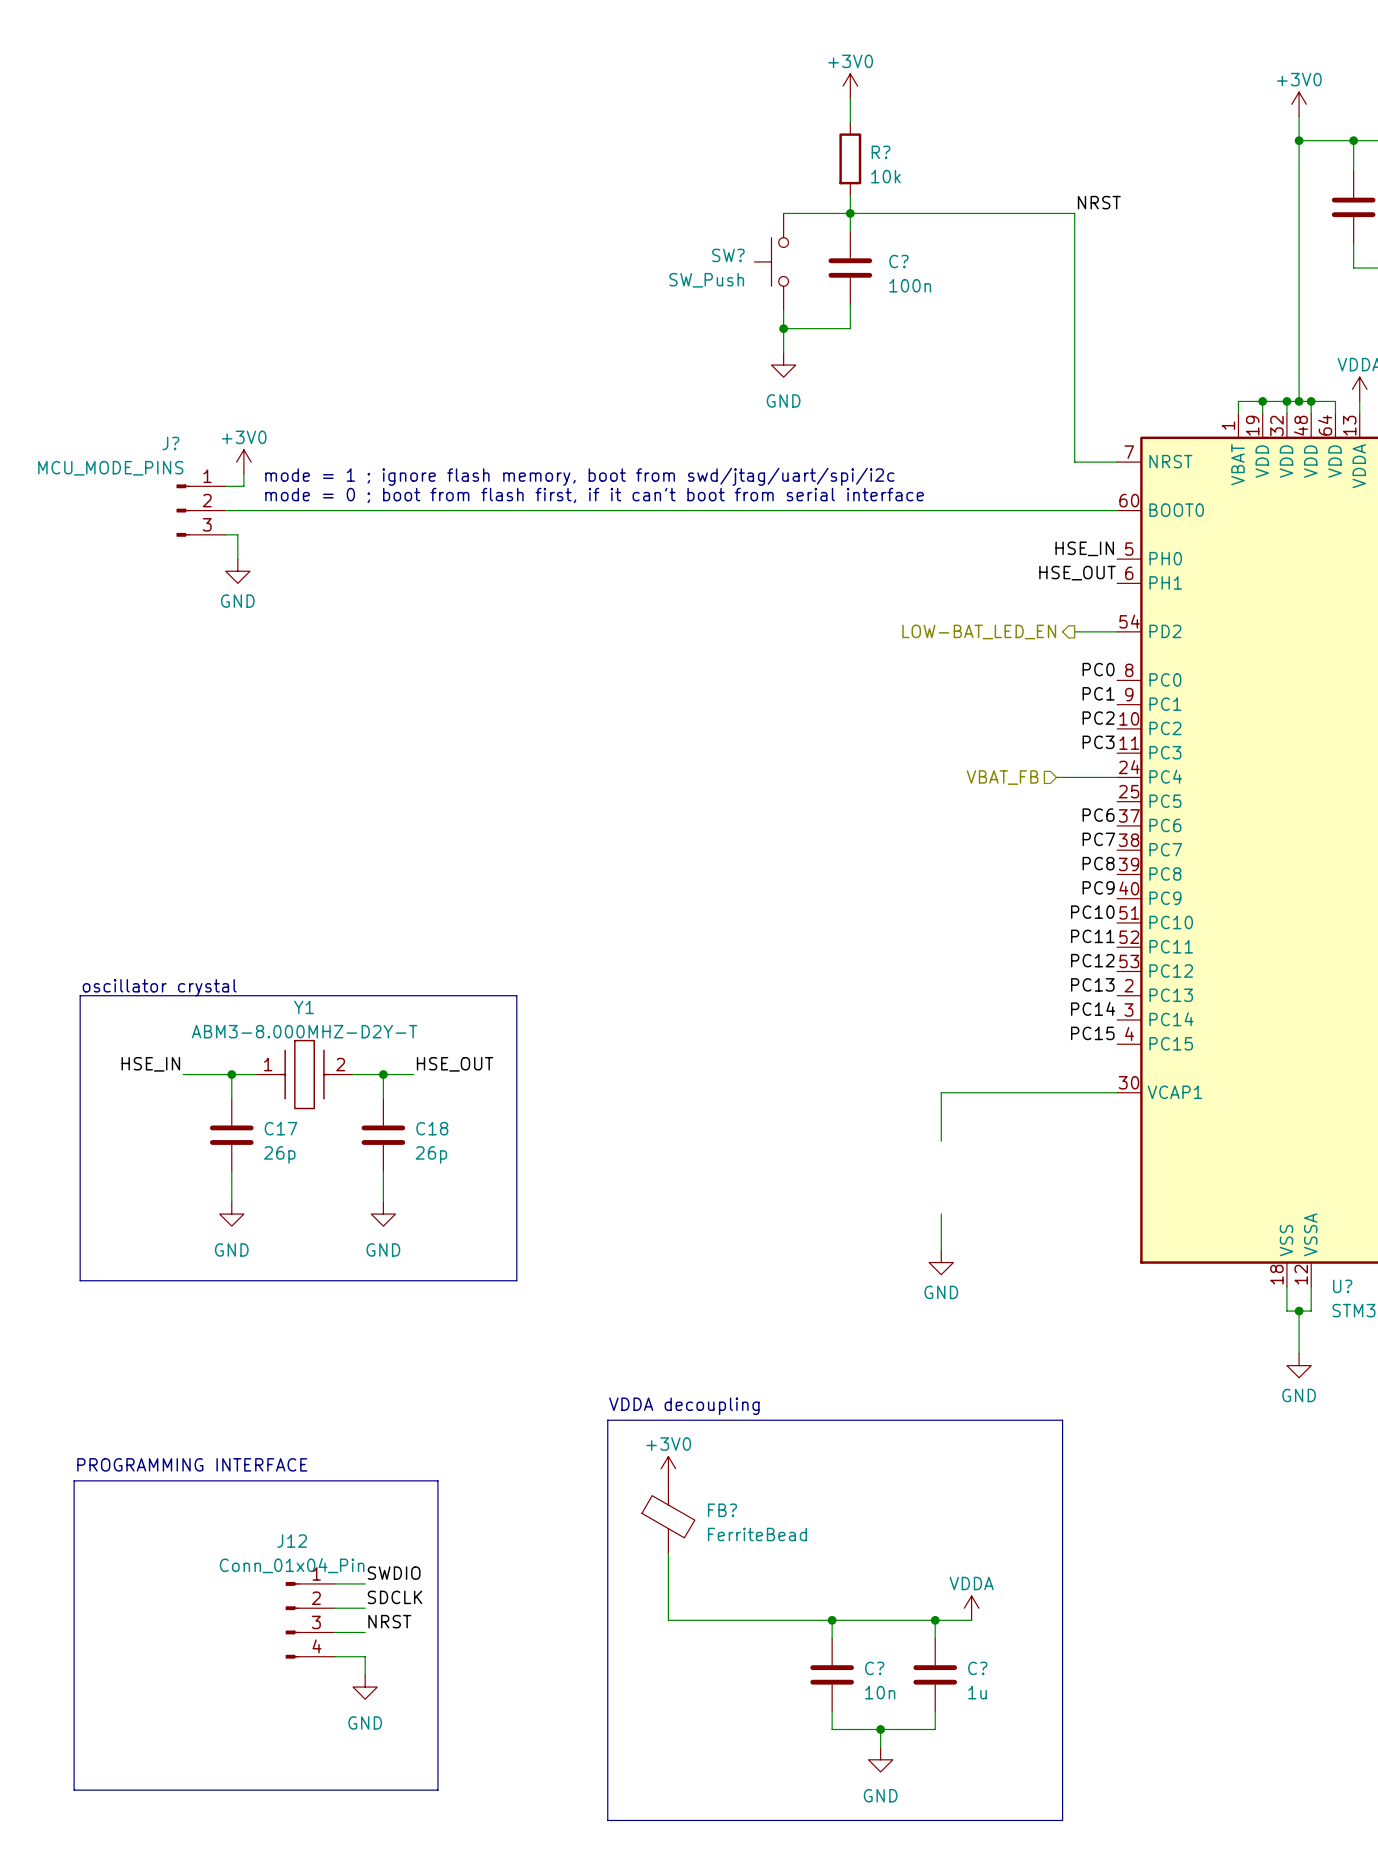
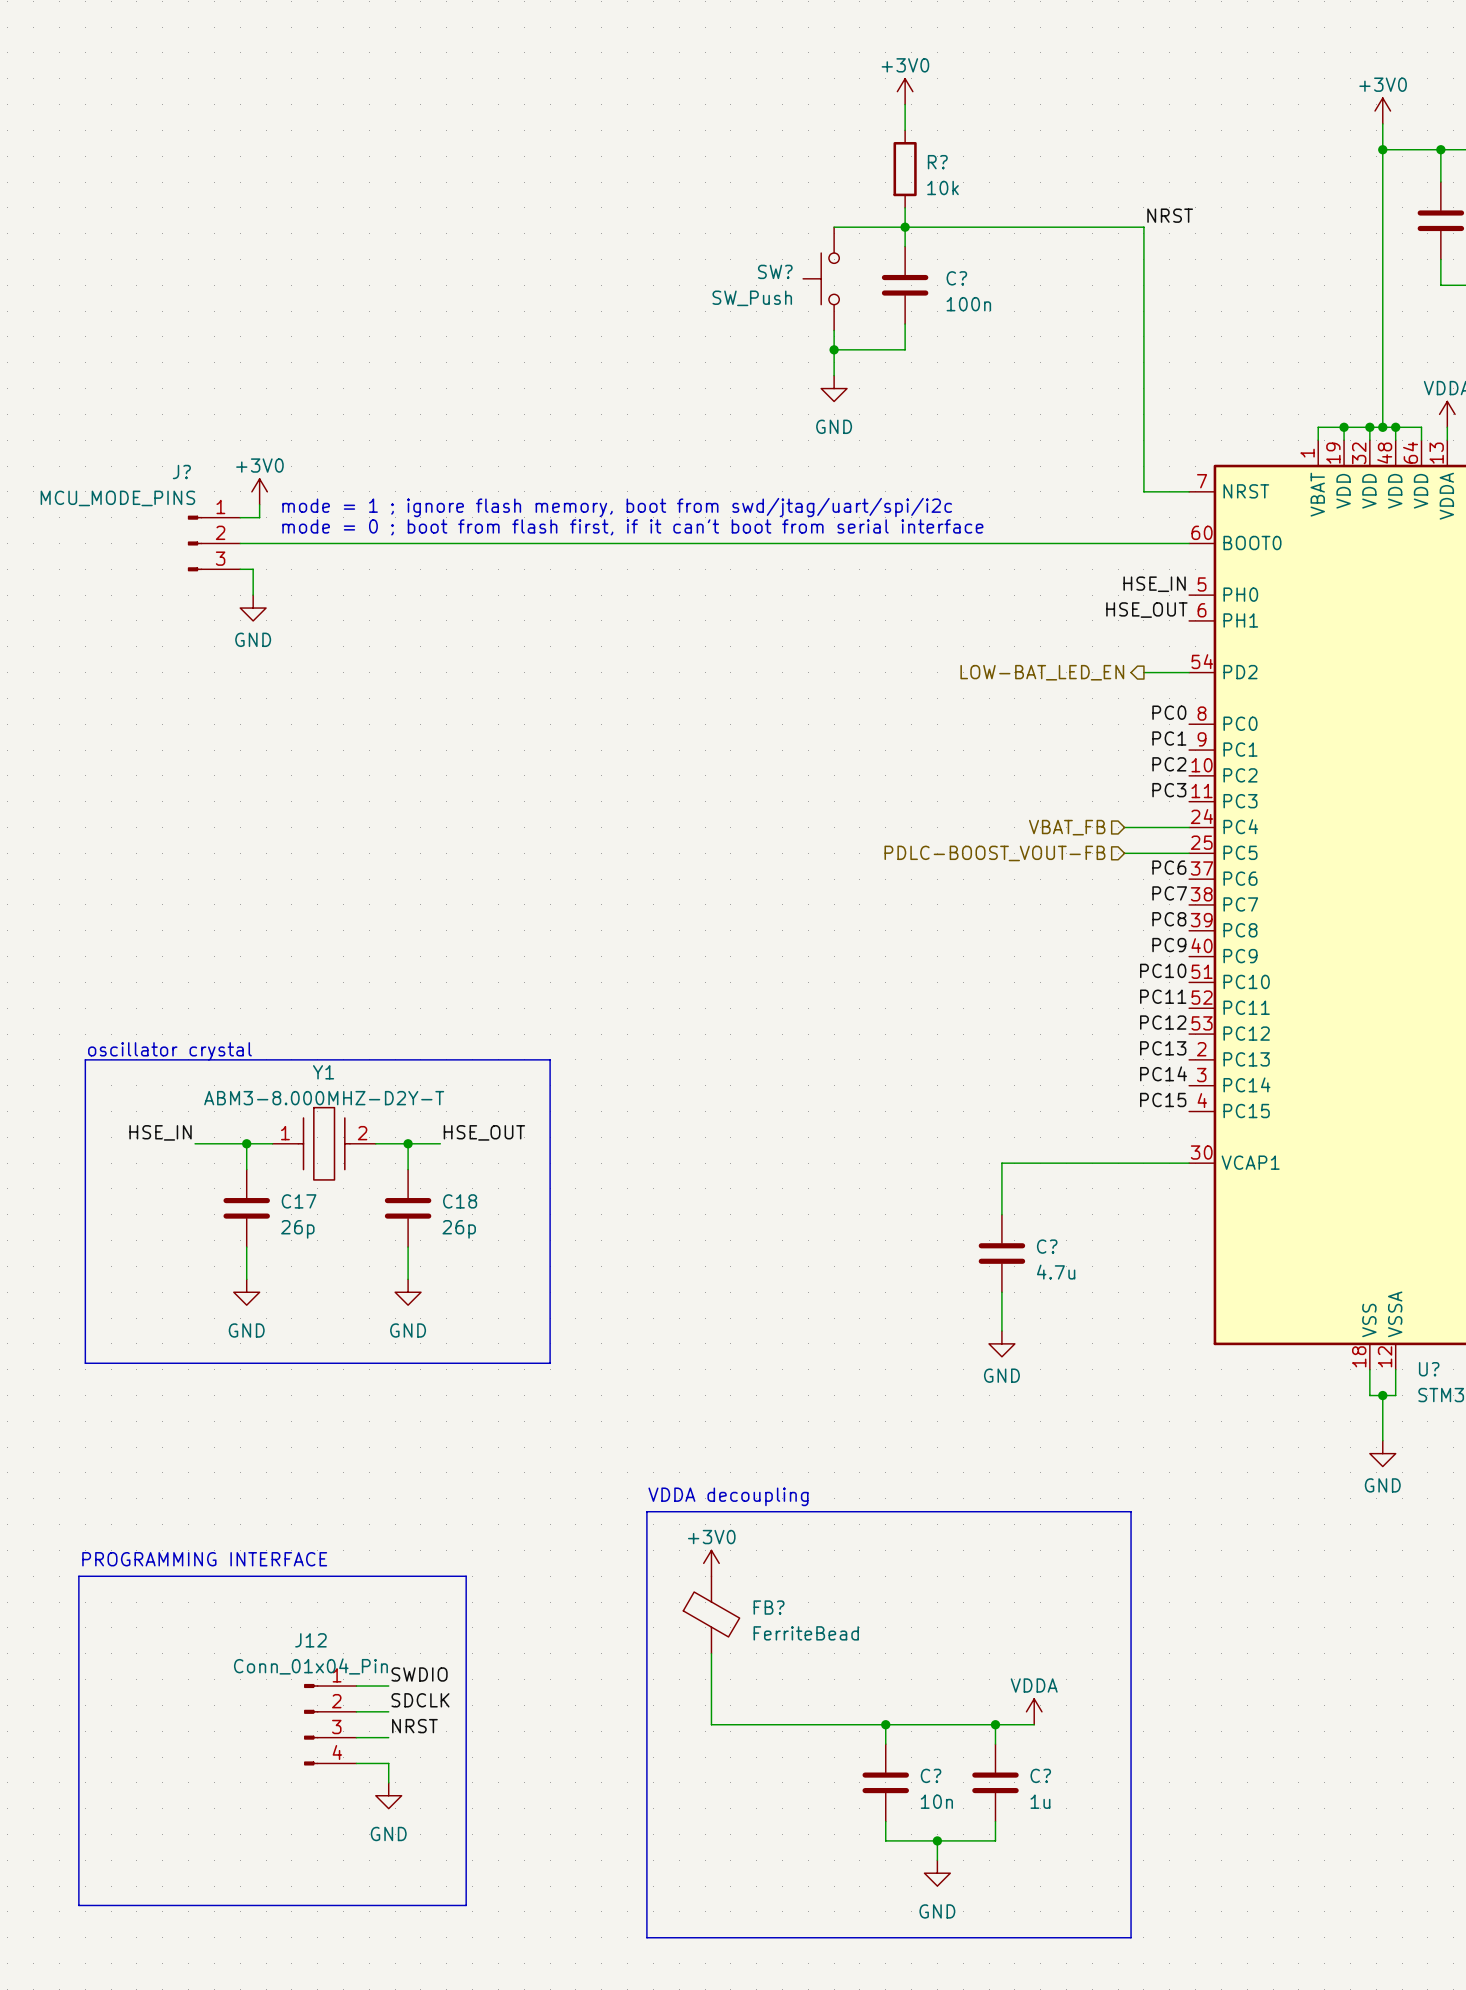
hierarchical label: none -> PDLC-BOOST_VOUT-FB (994, 853)
wire: none -> (1124, 853) (1189, 853)
C?: none -> 4.7u (1001, 1253)

